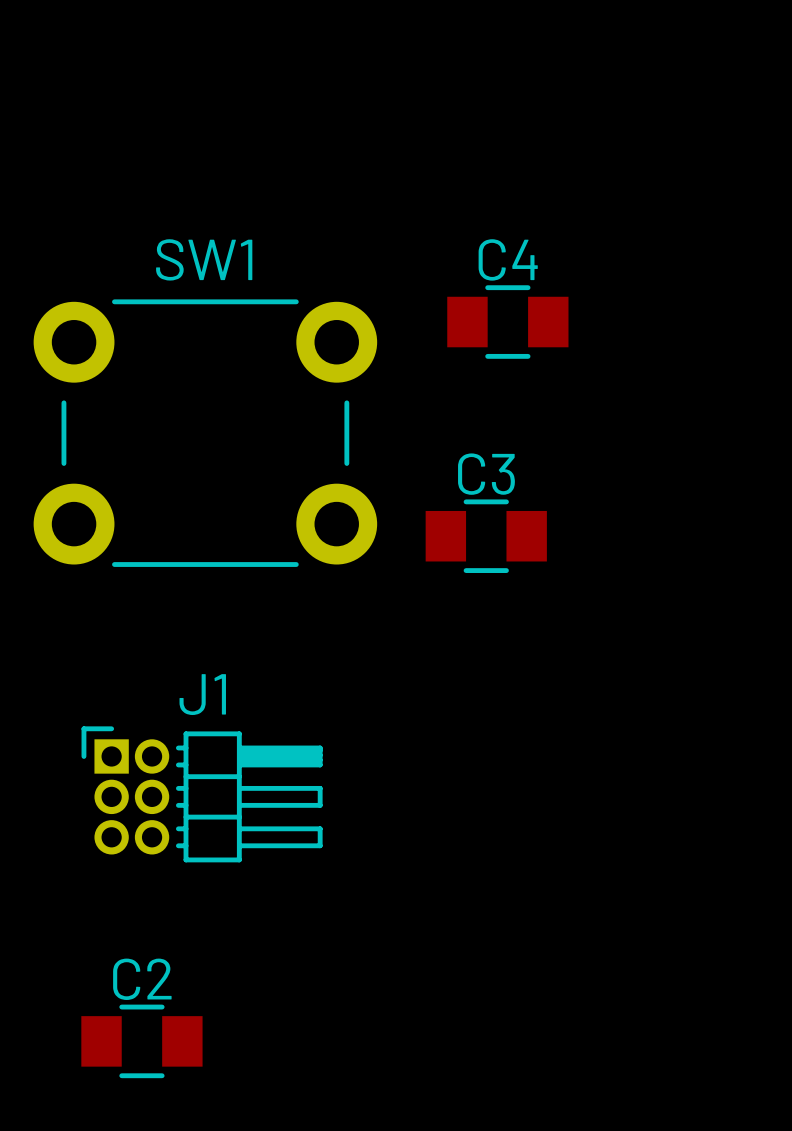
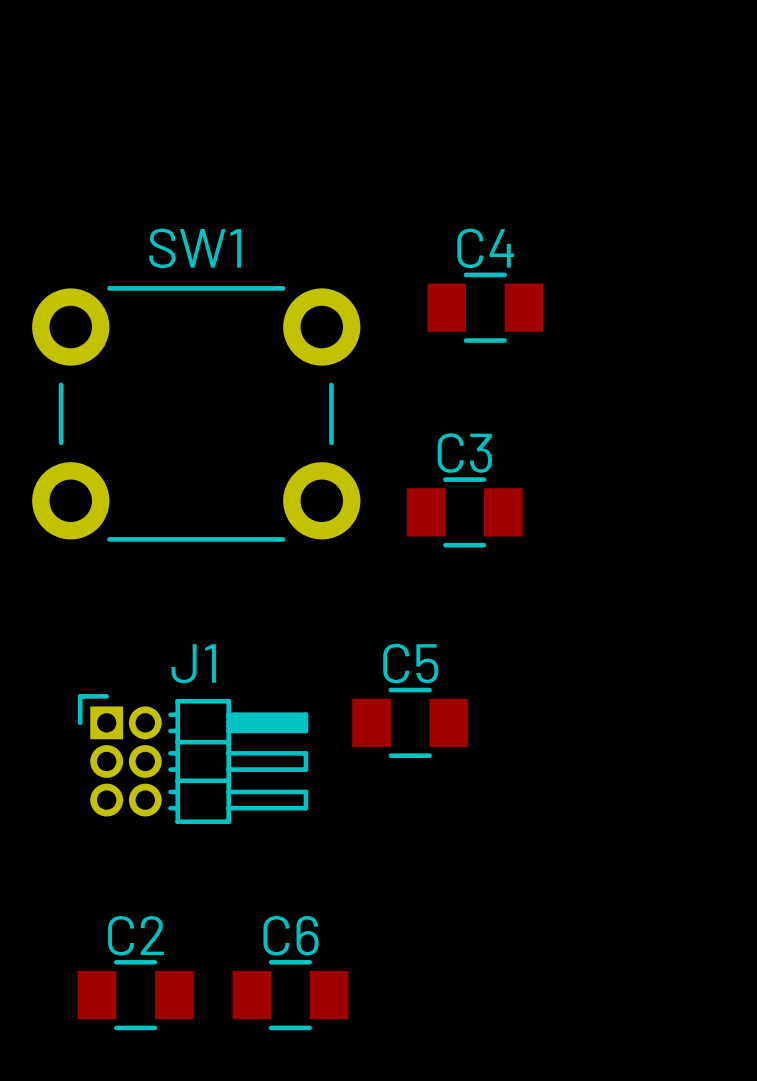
C5: none -> (410, 722)
C6: none -> (290, 995)

